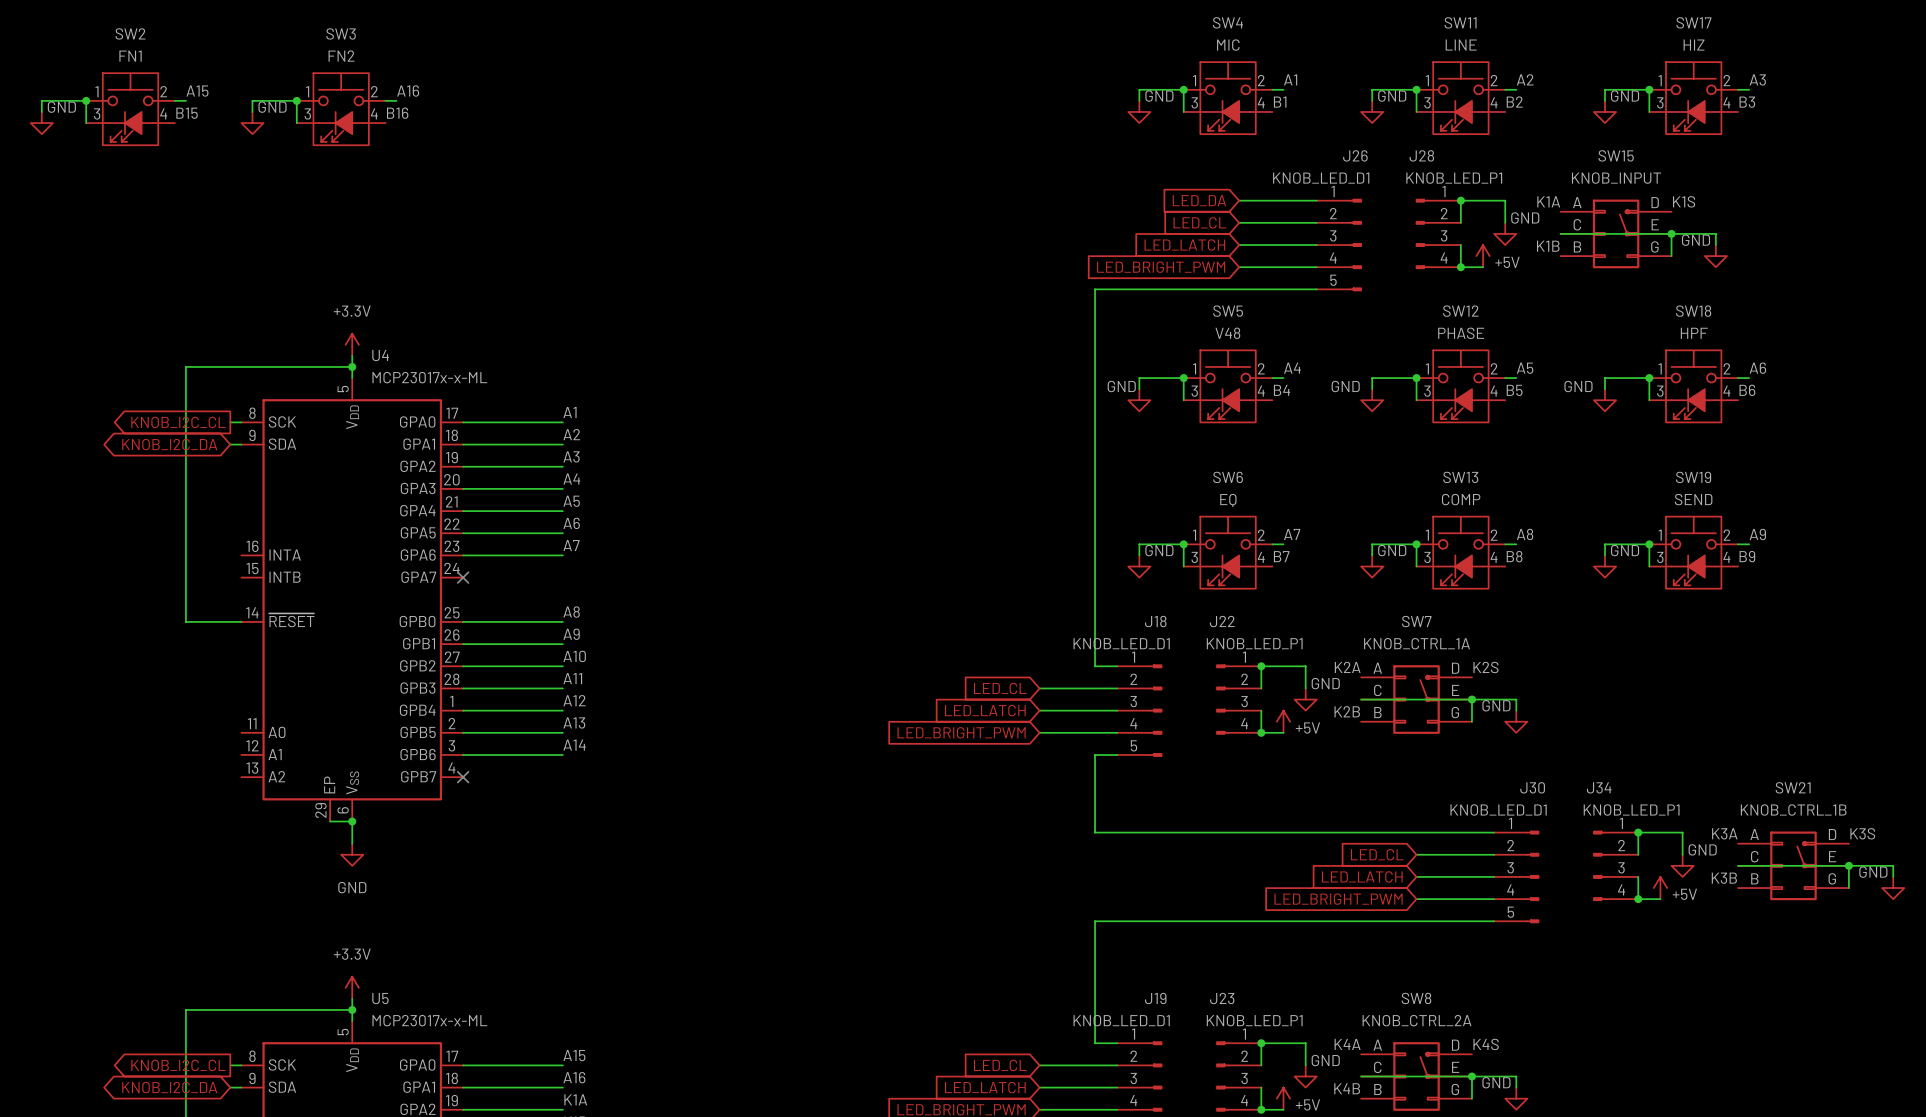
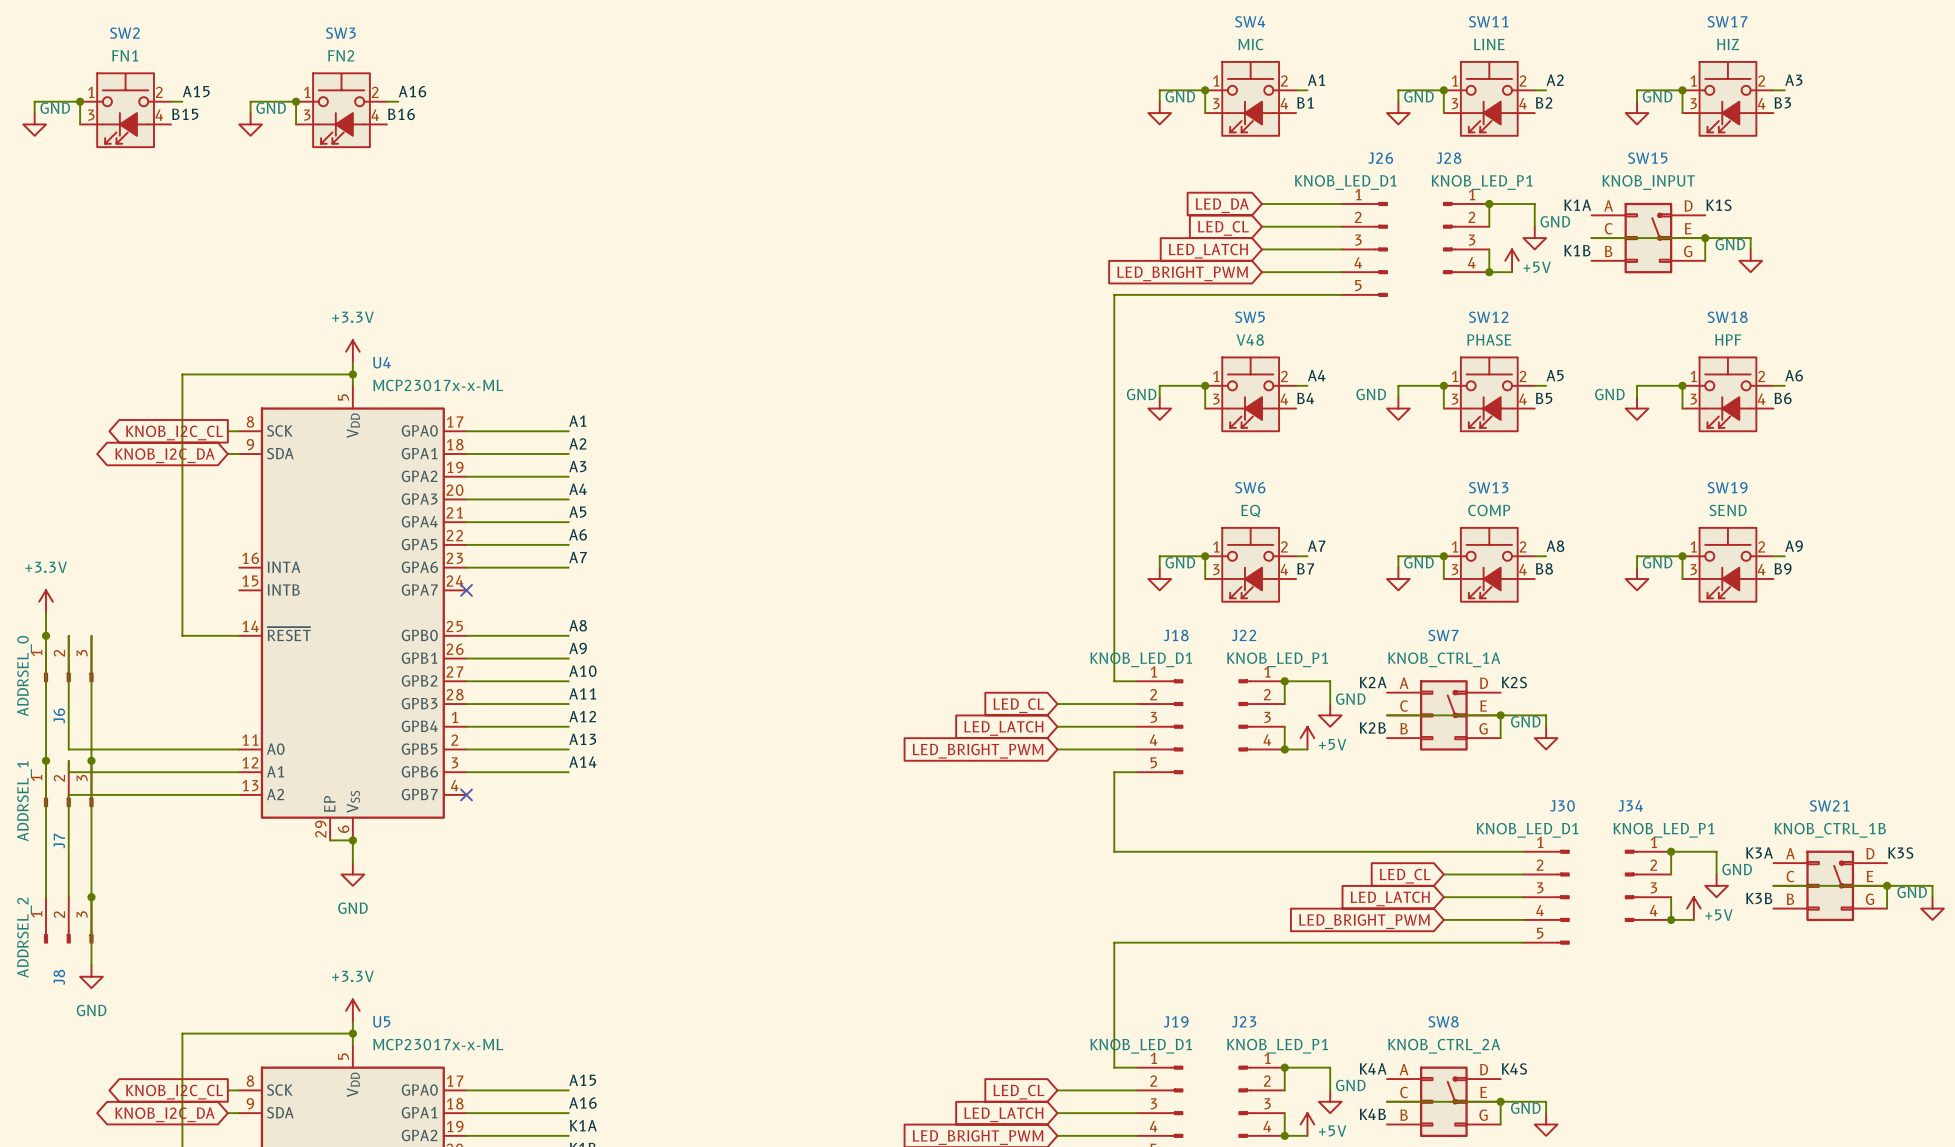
power symbol: none -> +3.3V (46, 601)
wire: none -> (46, 613) (46, 897)
junction: none -> (46, 635)
wire: none -> (68, 635) (68, 749) (239, 749)
wire: none -> (91, 635) (91, 965)
J6: none -> ADDRSEL_0 (68, 658)
junction: none -> (46, 760)
wire: none -> (68, 760) (68, 772) (239, 772)
junction: none -> (91, 760)
J7: none -> ADDRSEL_1 (68, 783)
wire: none -> (239, 794) (68, 794) (68, 897)
junction: none -> (91, 897)
J8: none -> ADDRSEL_2 (68, 920)
power symbol: none -> GND (91, 976)

